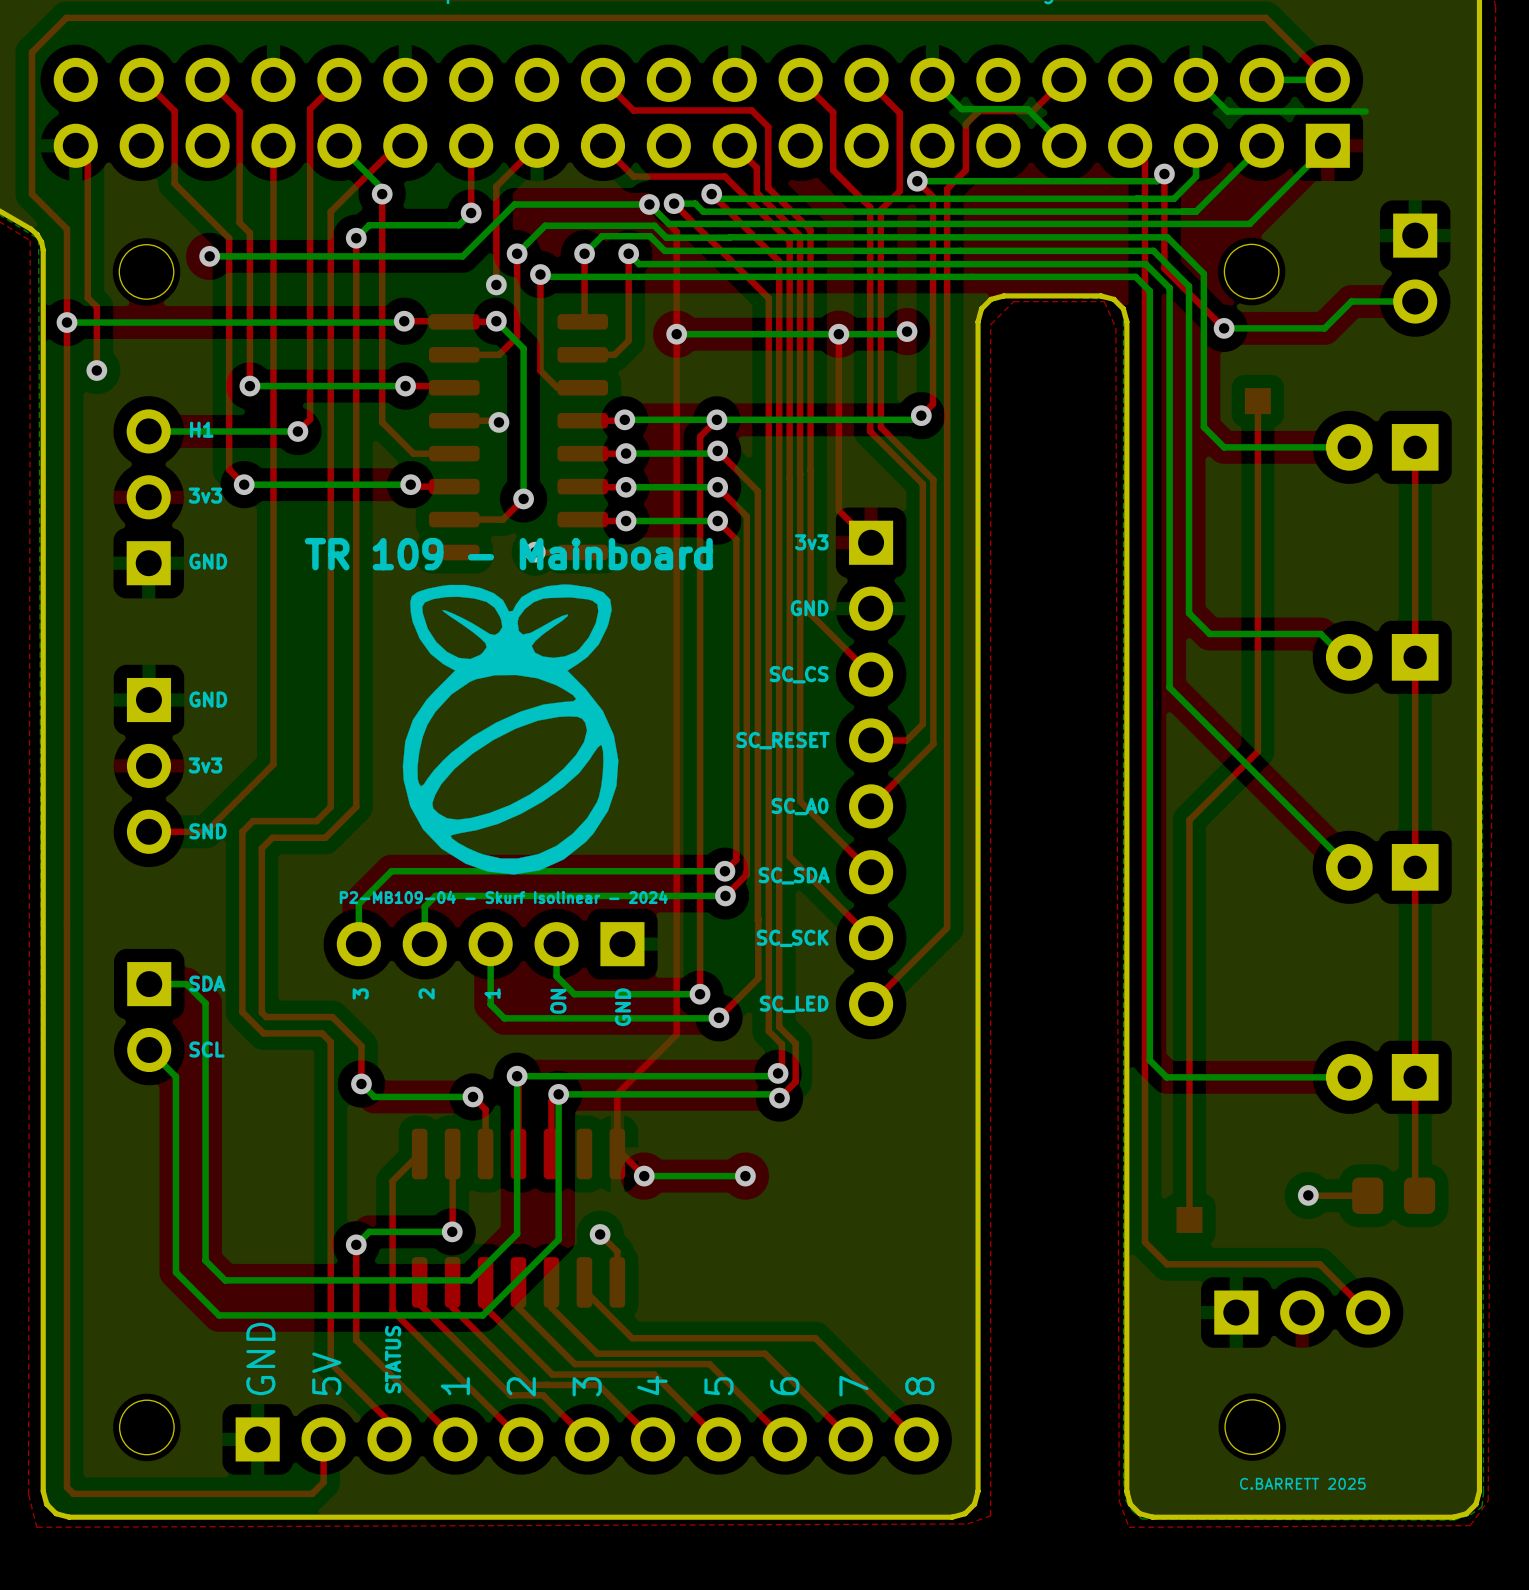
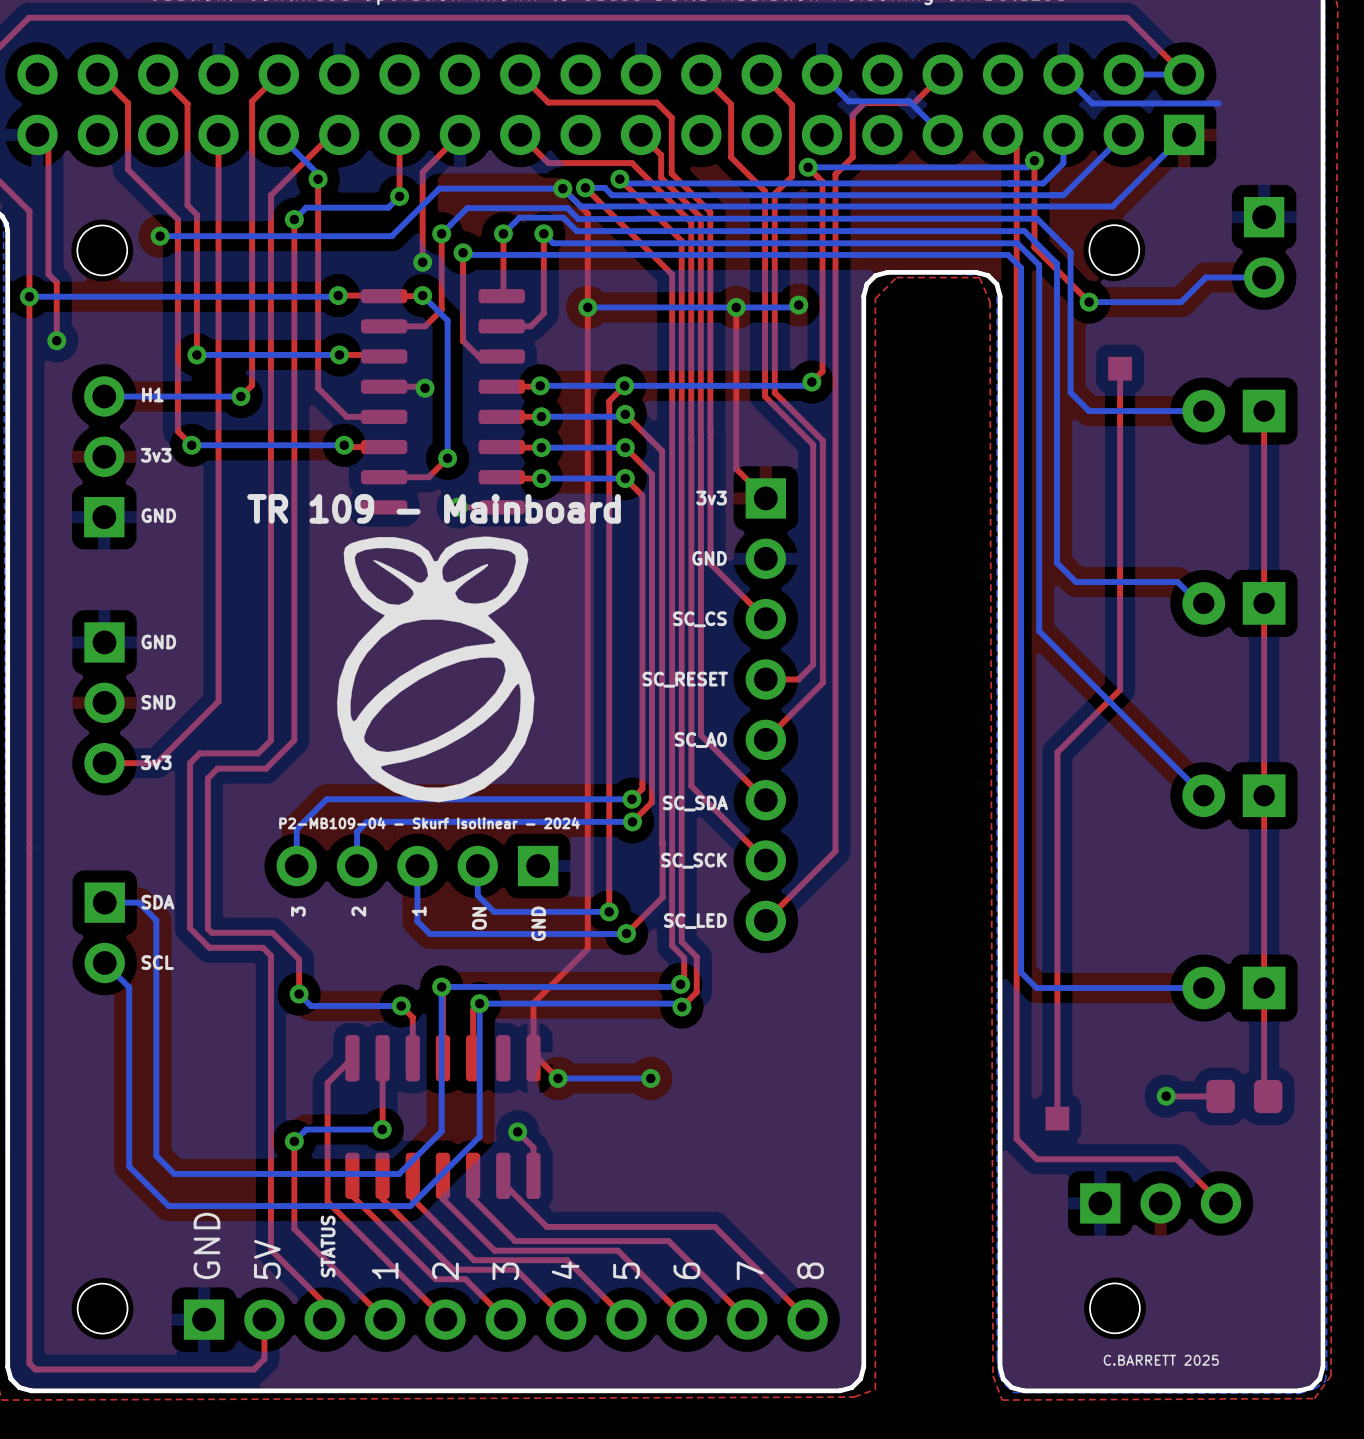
text: 3v3 (205, 765) -> SND (158, 702)
text: SND (207, 831) -> 3v3 (156, 762)

